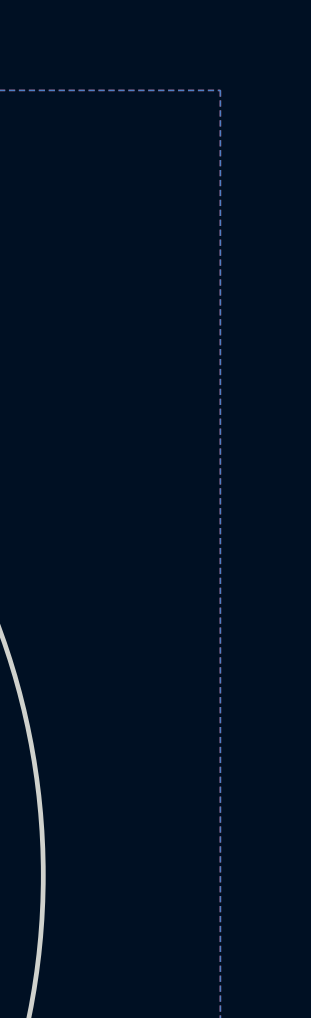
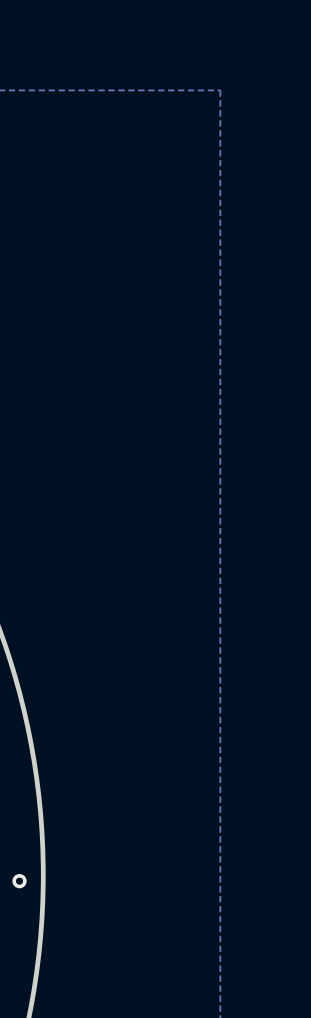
via: none -> (19, 881)

